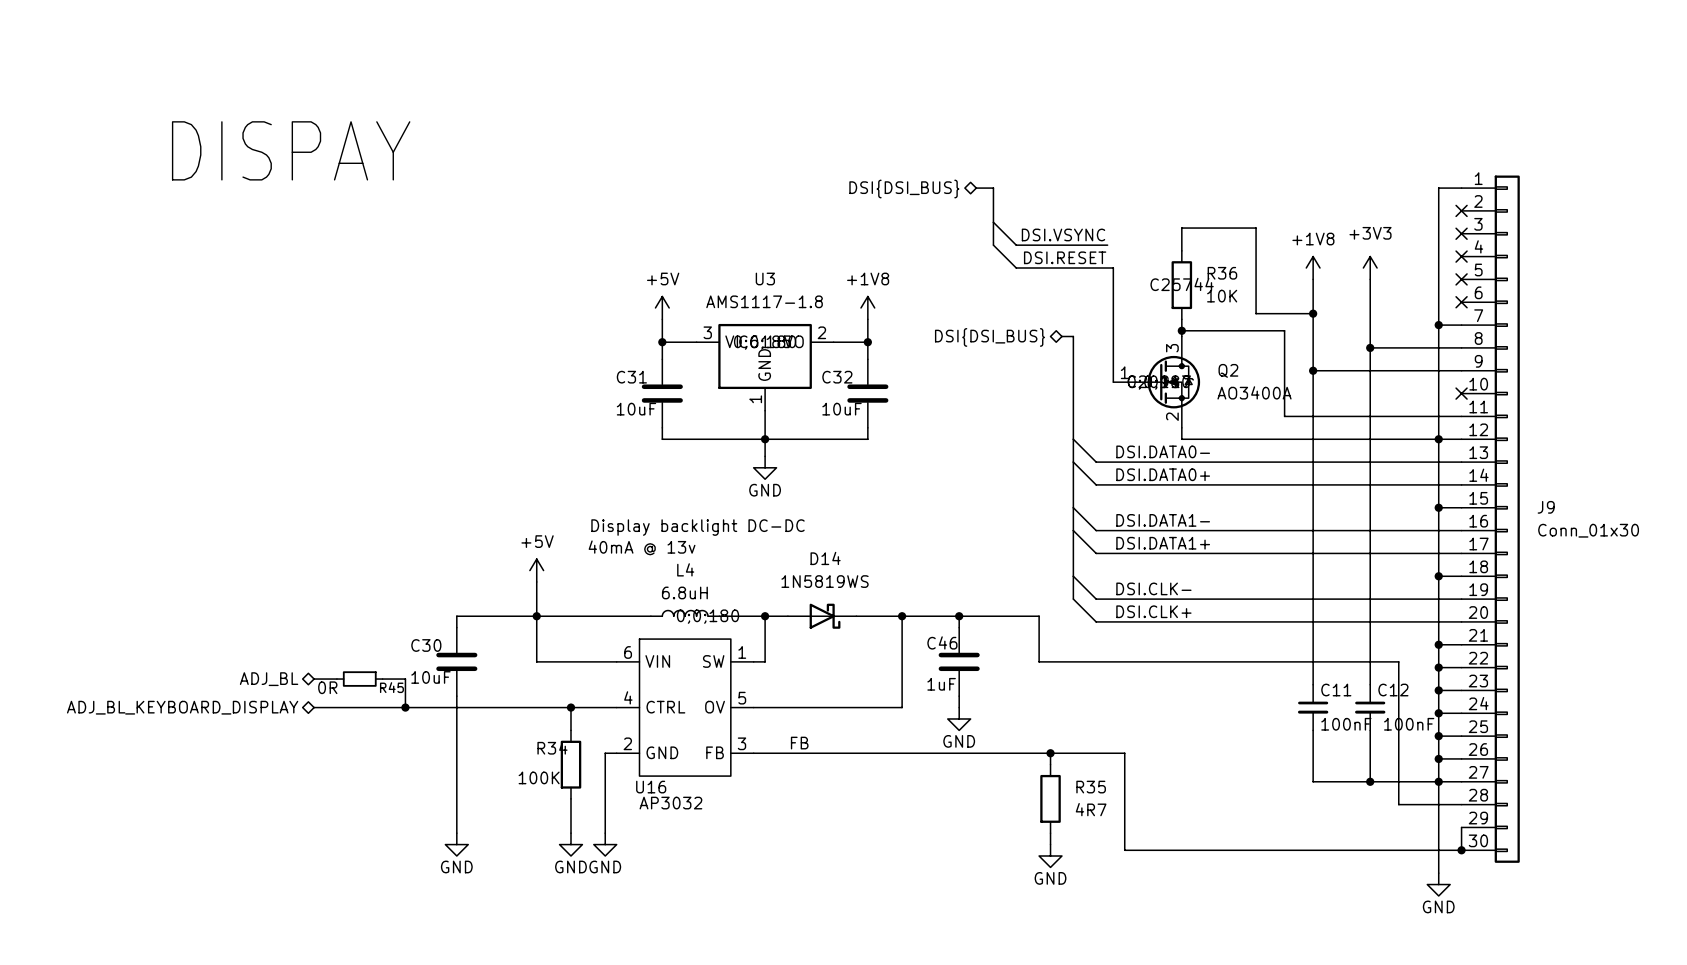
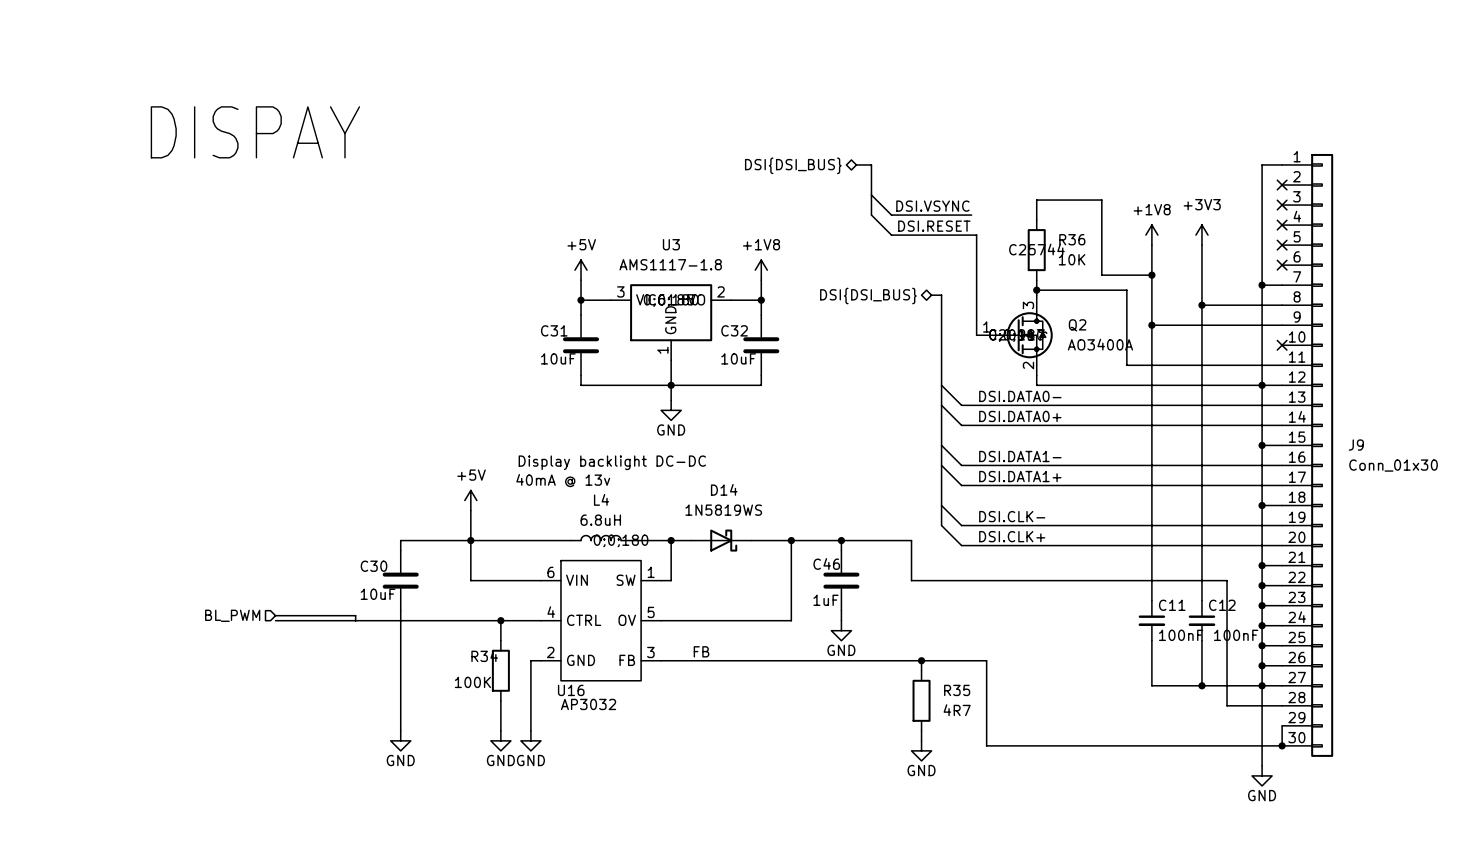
hierarchical label: ADJ_BL (269, 679) -> none
wire: (314, 679) (336, 679) -> none
R45: 0R (359, 679) -> none
wire: (382, 679) (405, 679) (405, 701) -> (275, 615) (355, 615)
hierarchical label shape: bidirectional (182, 707) -> input (232, 615)
hierarchical label: ADJ_BL_KEYBOARD_DISPLAY (182, 707) -> BL_PWM (232, 615)
junction: (405, 707) -> none

